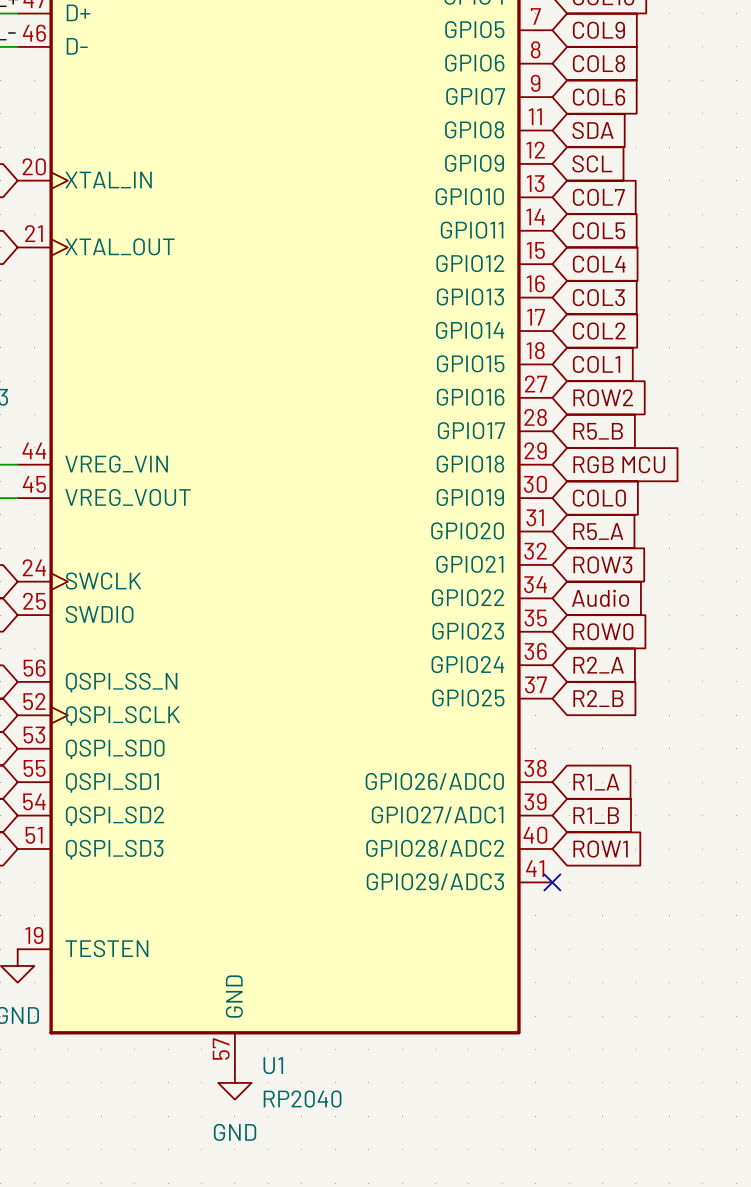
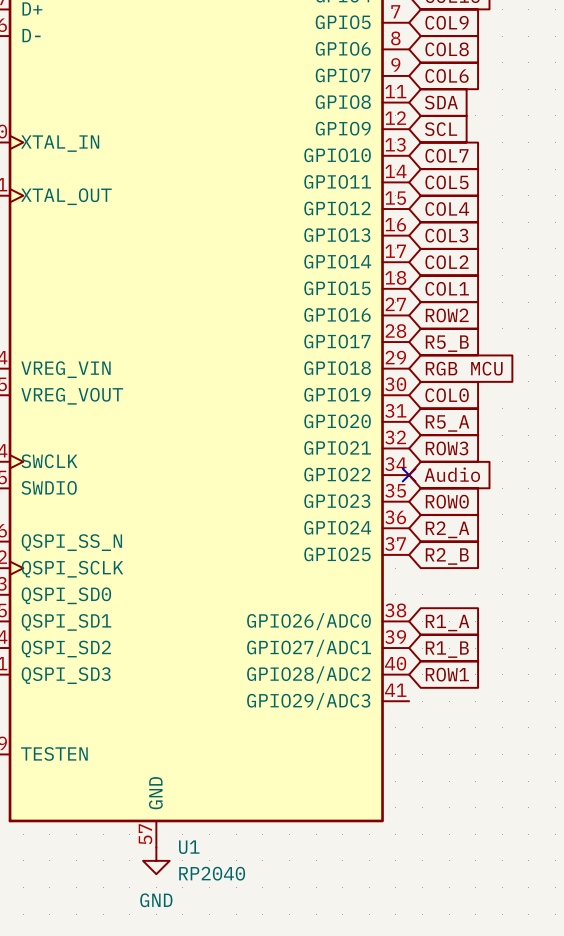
no-connect mark: none -> (409, 475)
no-connect mark: (552, 882) -> none

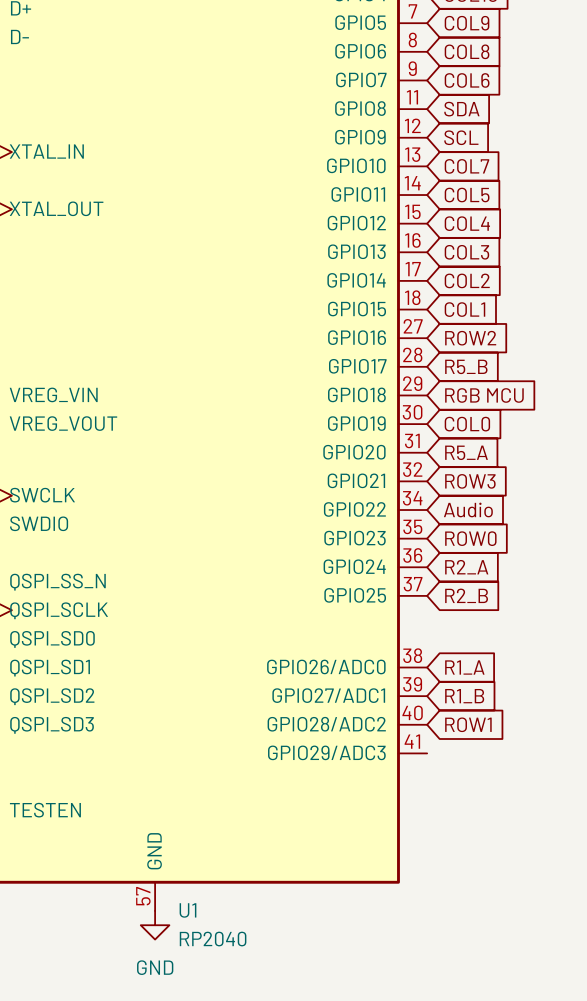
no-connect mark: (409, 475) -> none

